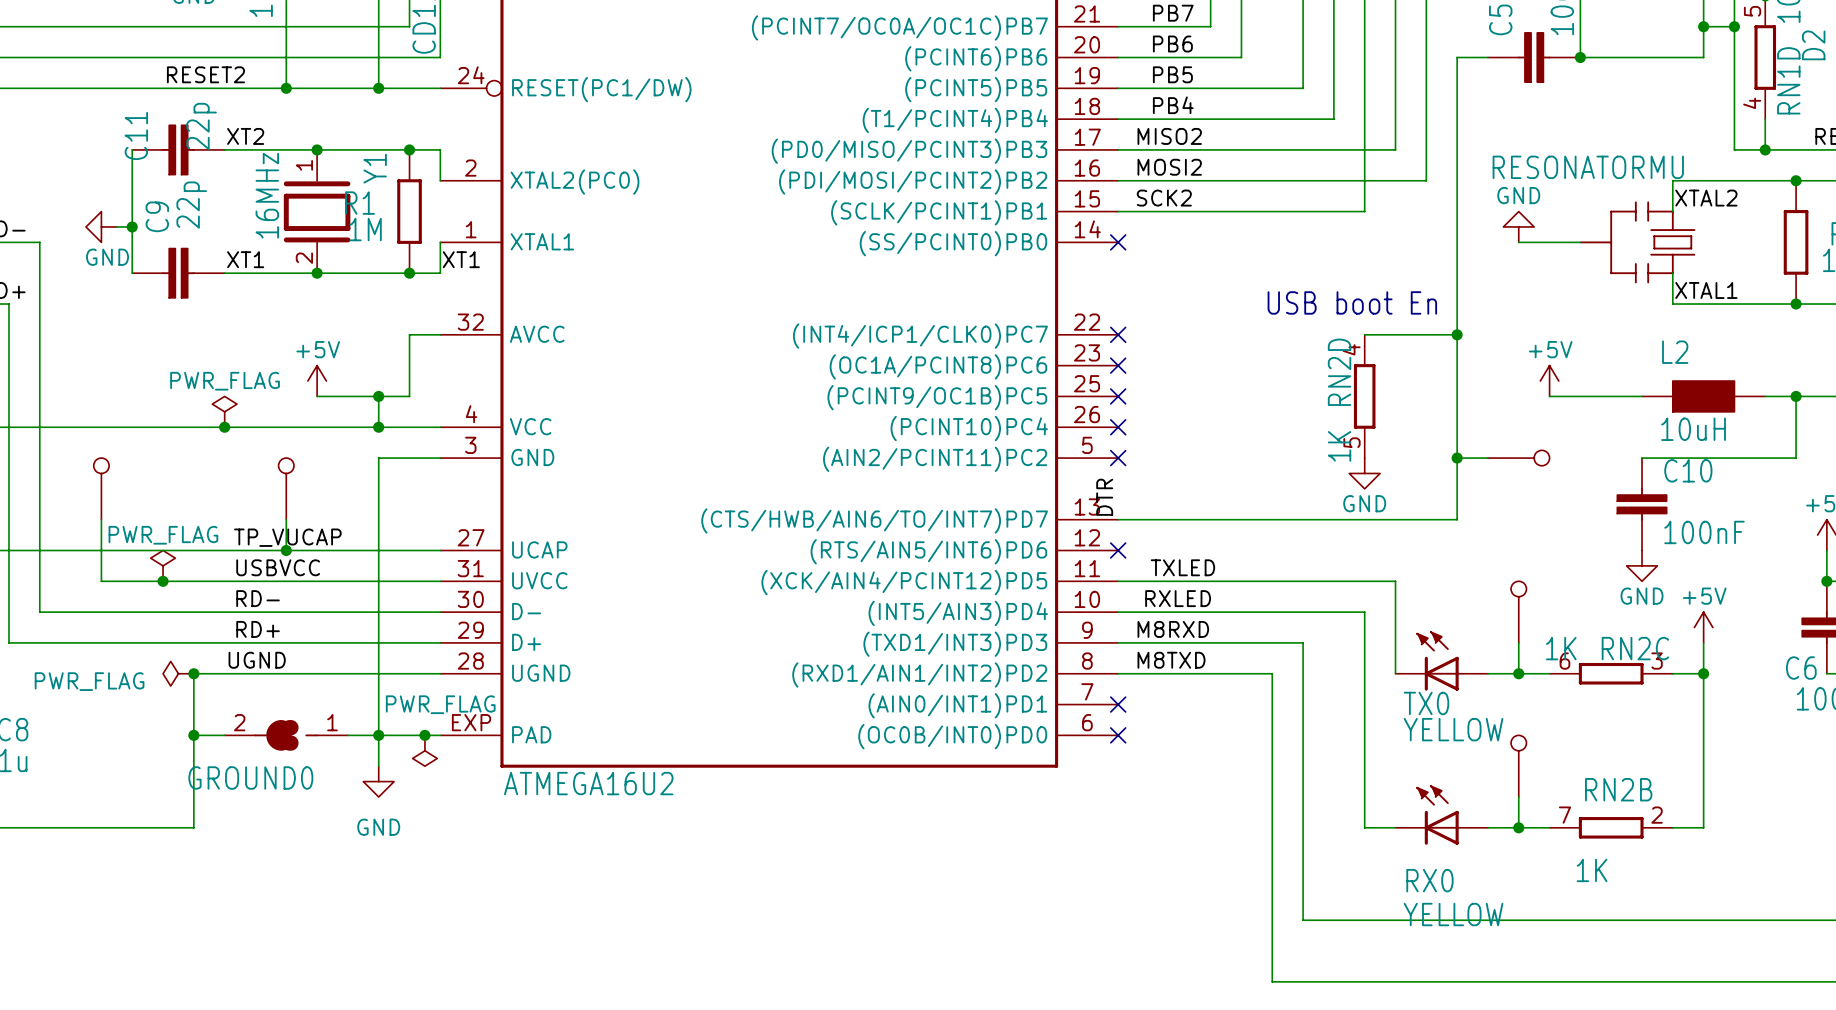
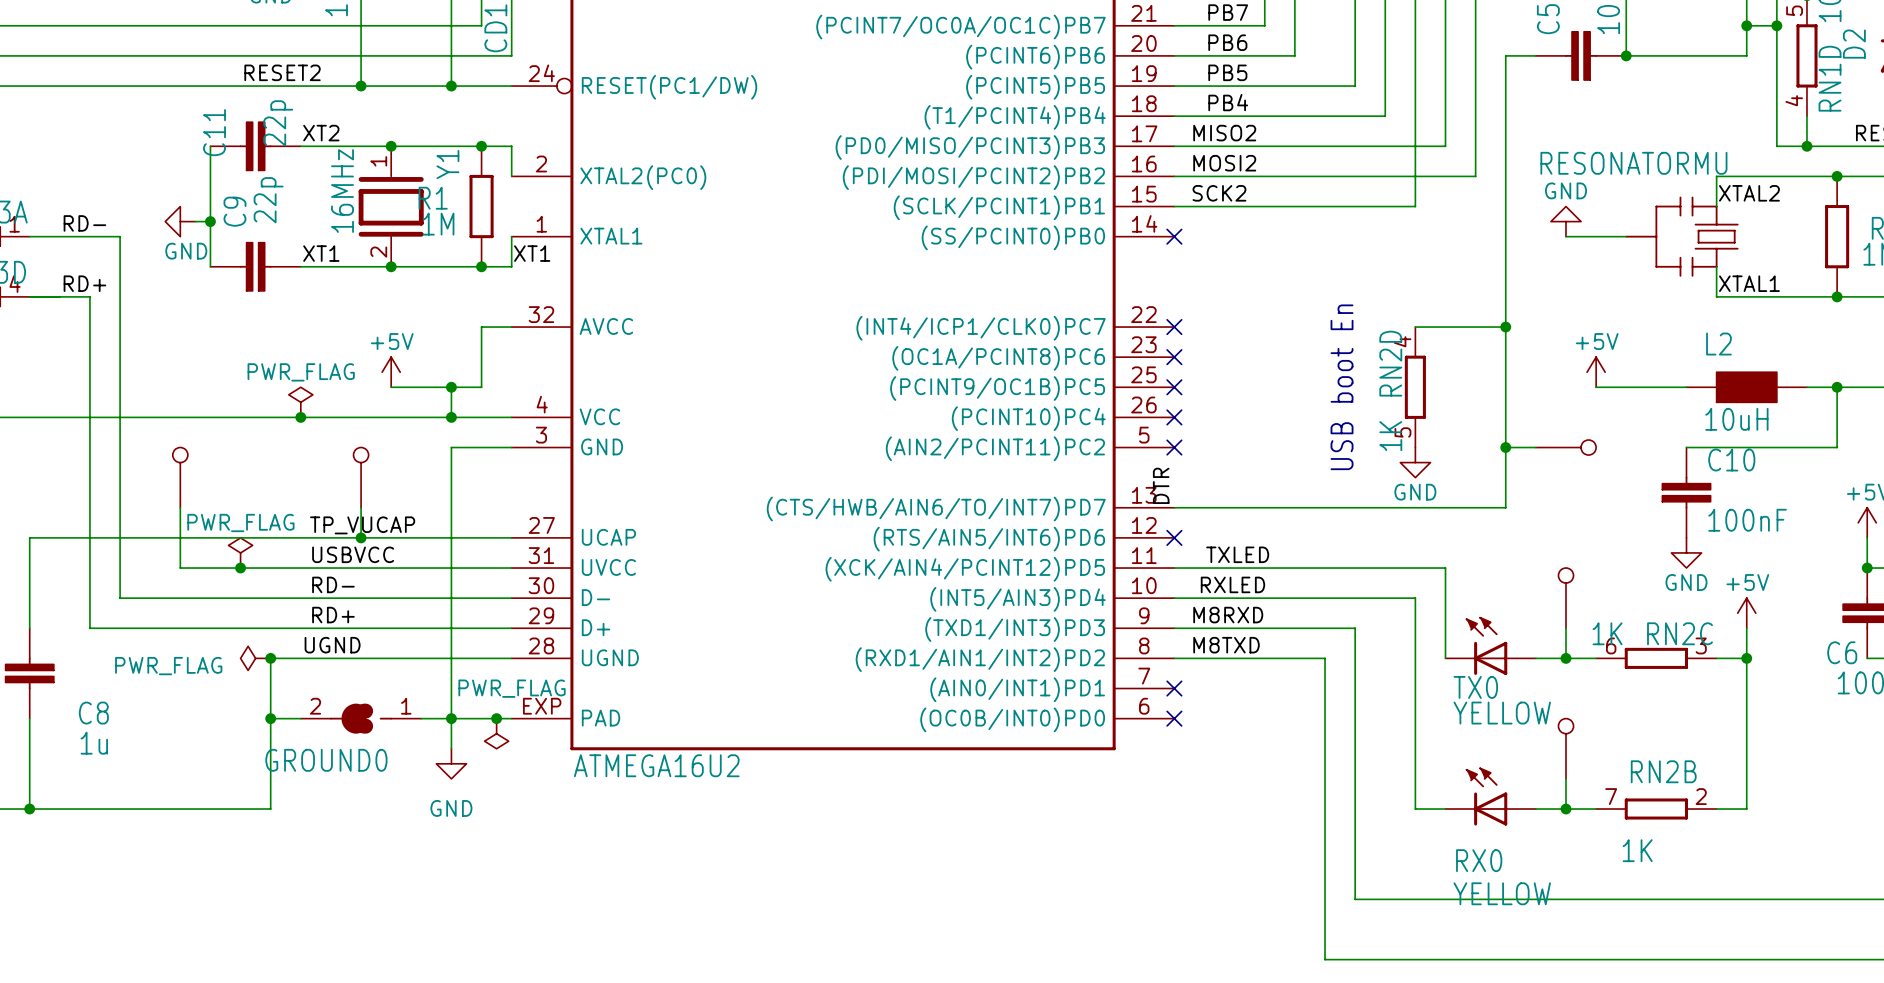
text rotation: 0° (1352, 302) -> 90° counterclockwise (1342, 387)

